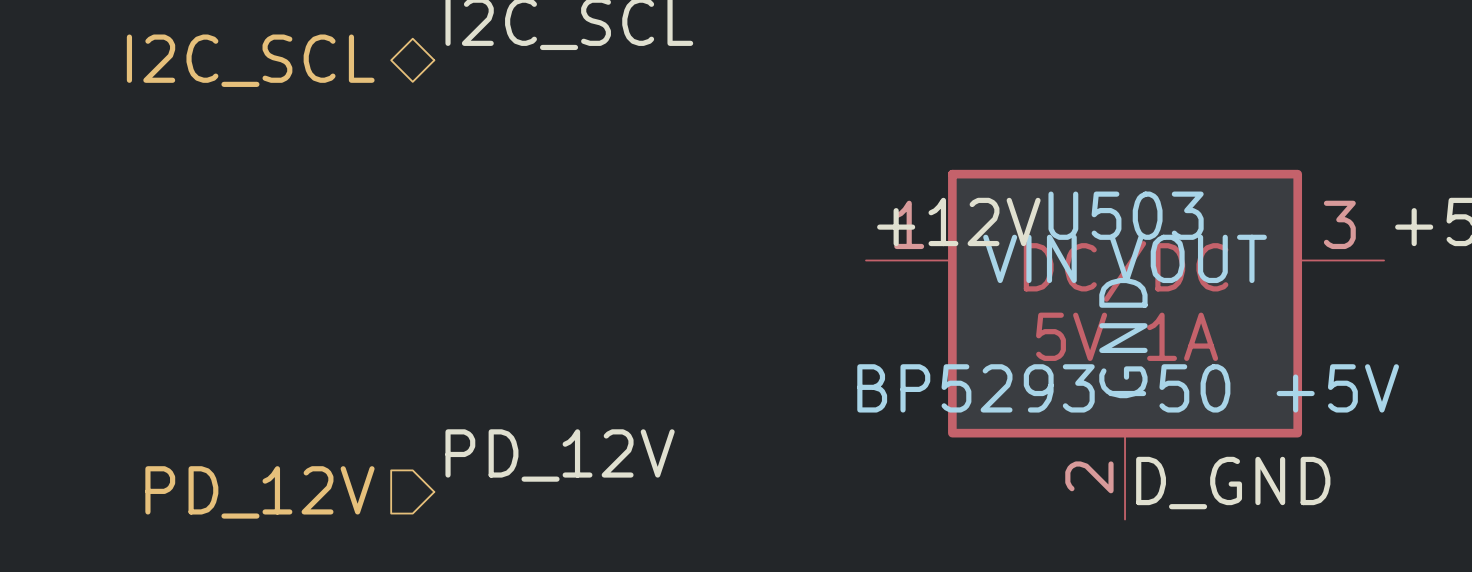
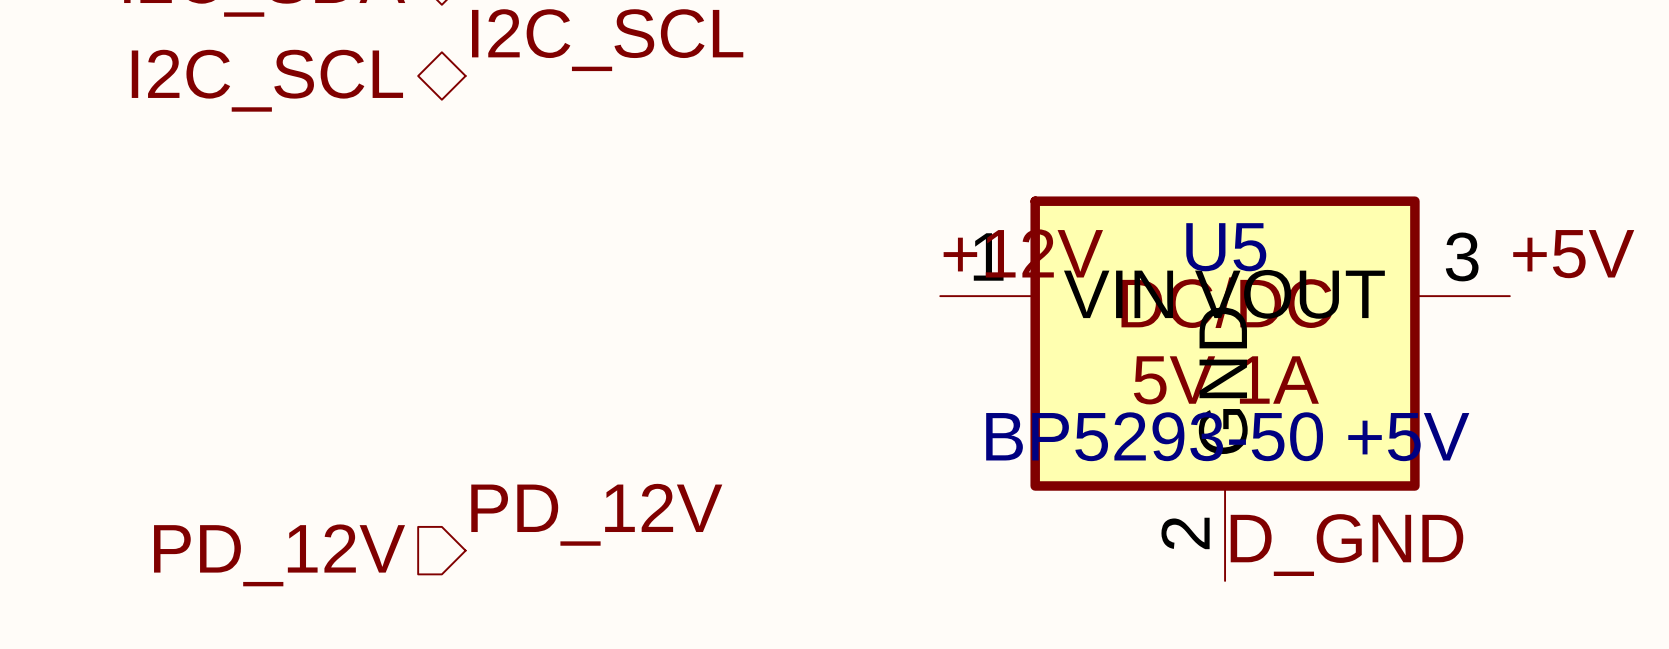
U503 name: U503 (1126, 215) -> U5 (1226, 247)

